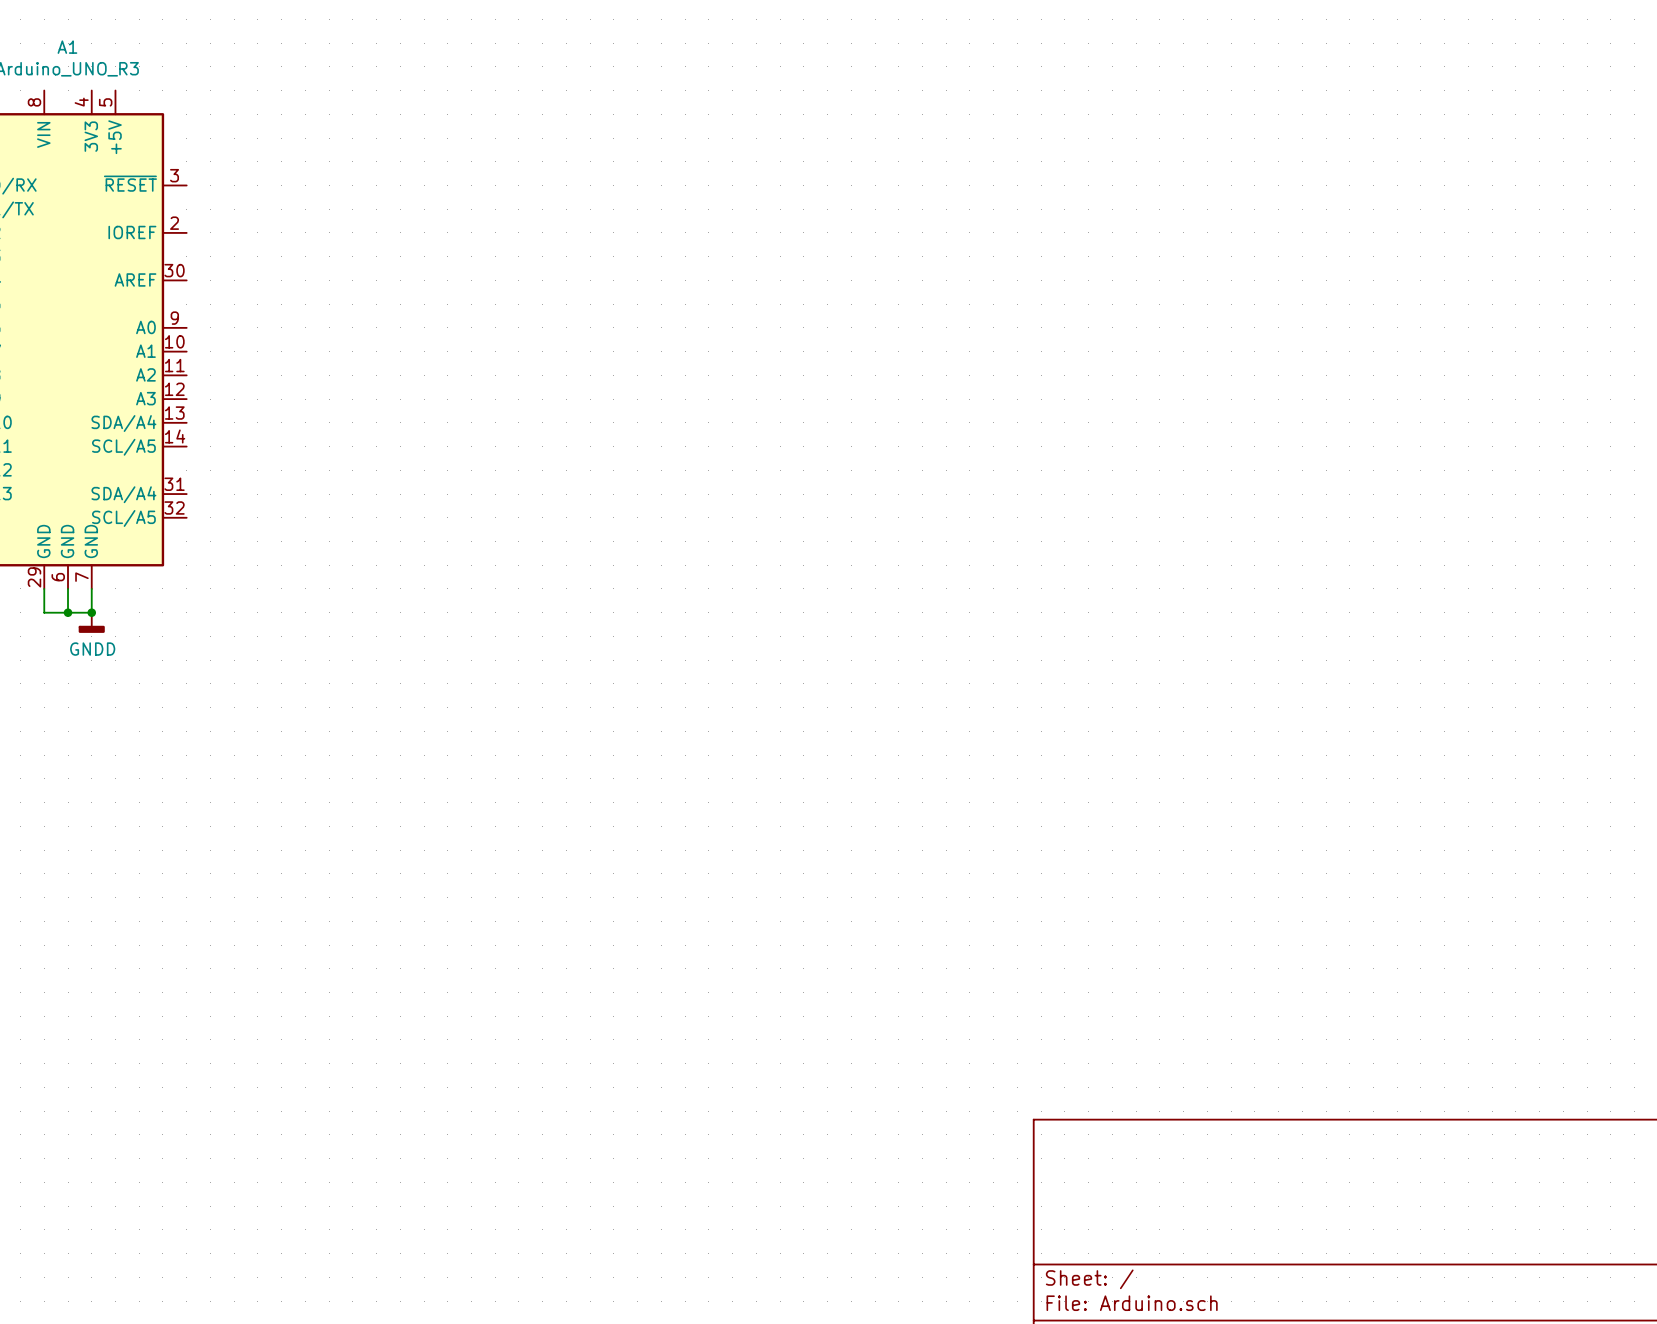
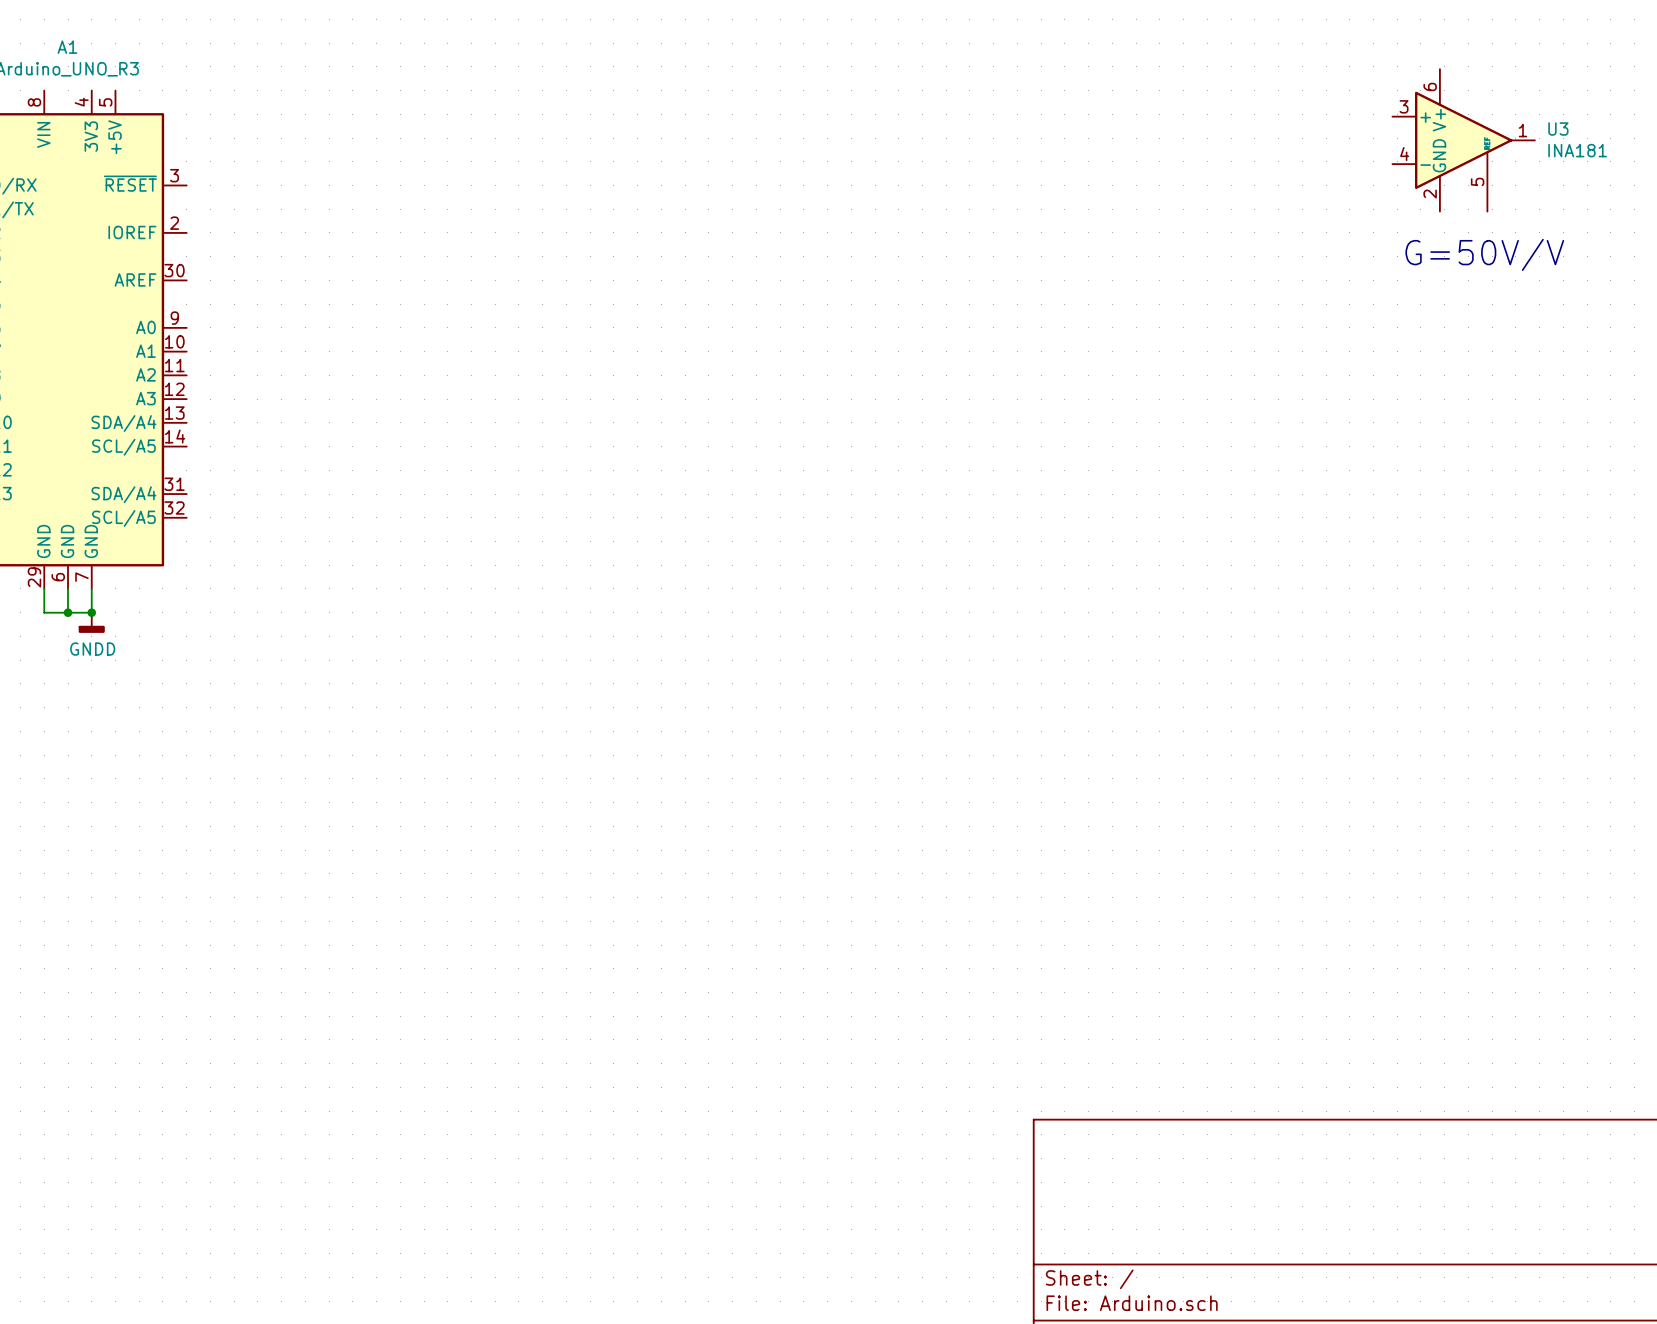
U3: none -> INA181 (1463, 140)
text: none -> G=50V/V (1484, 254)

